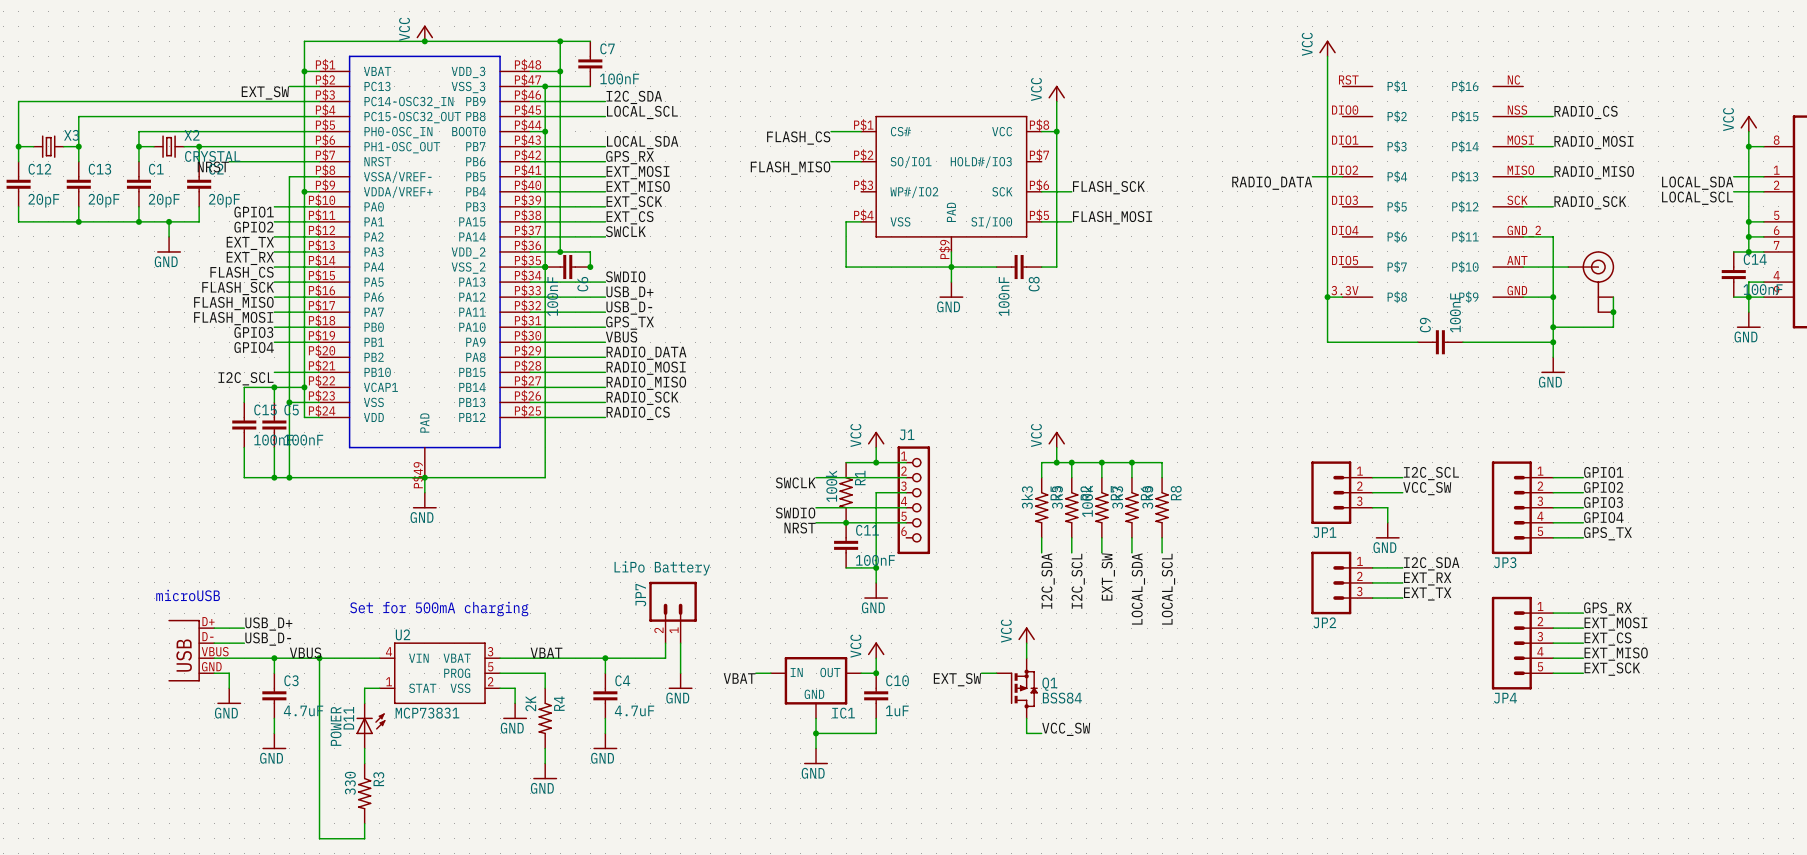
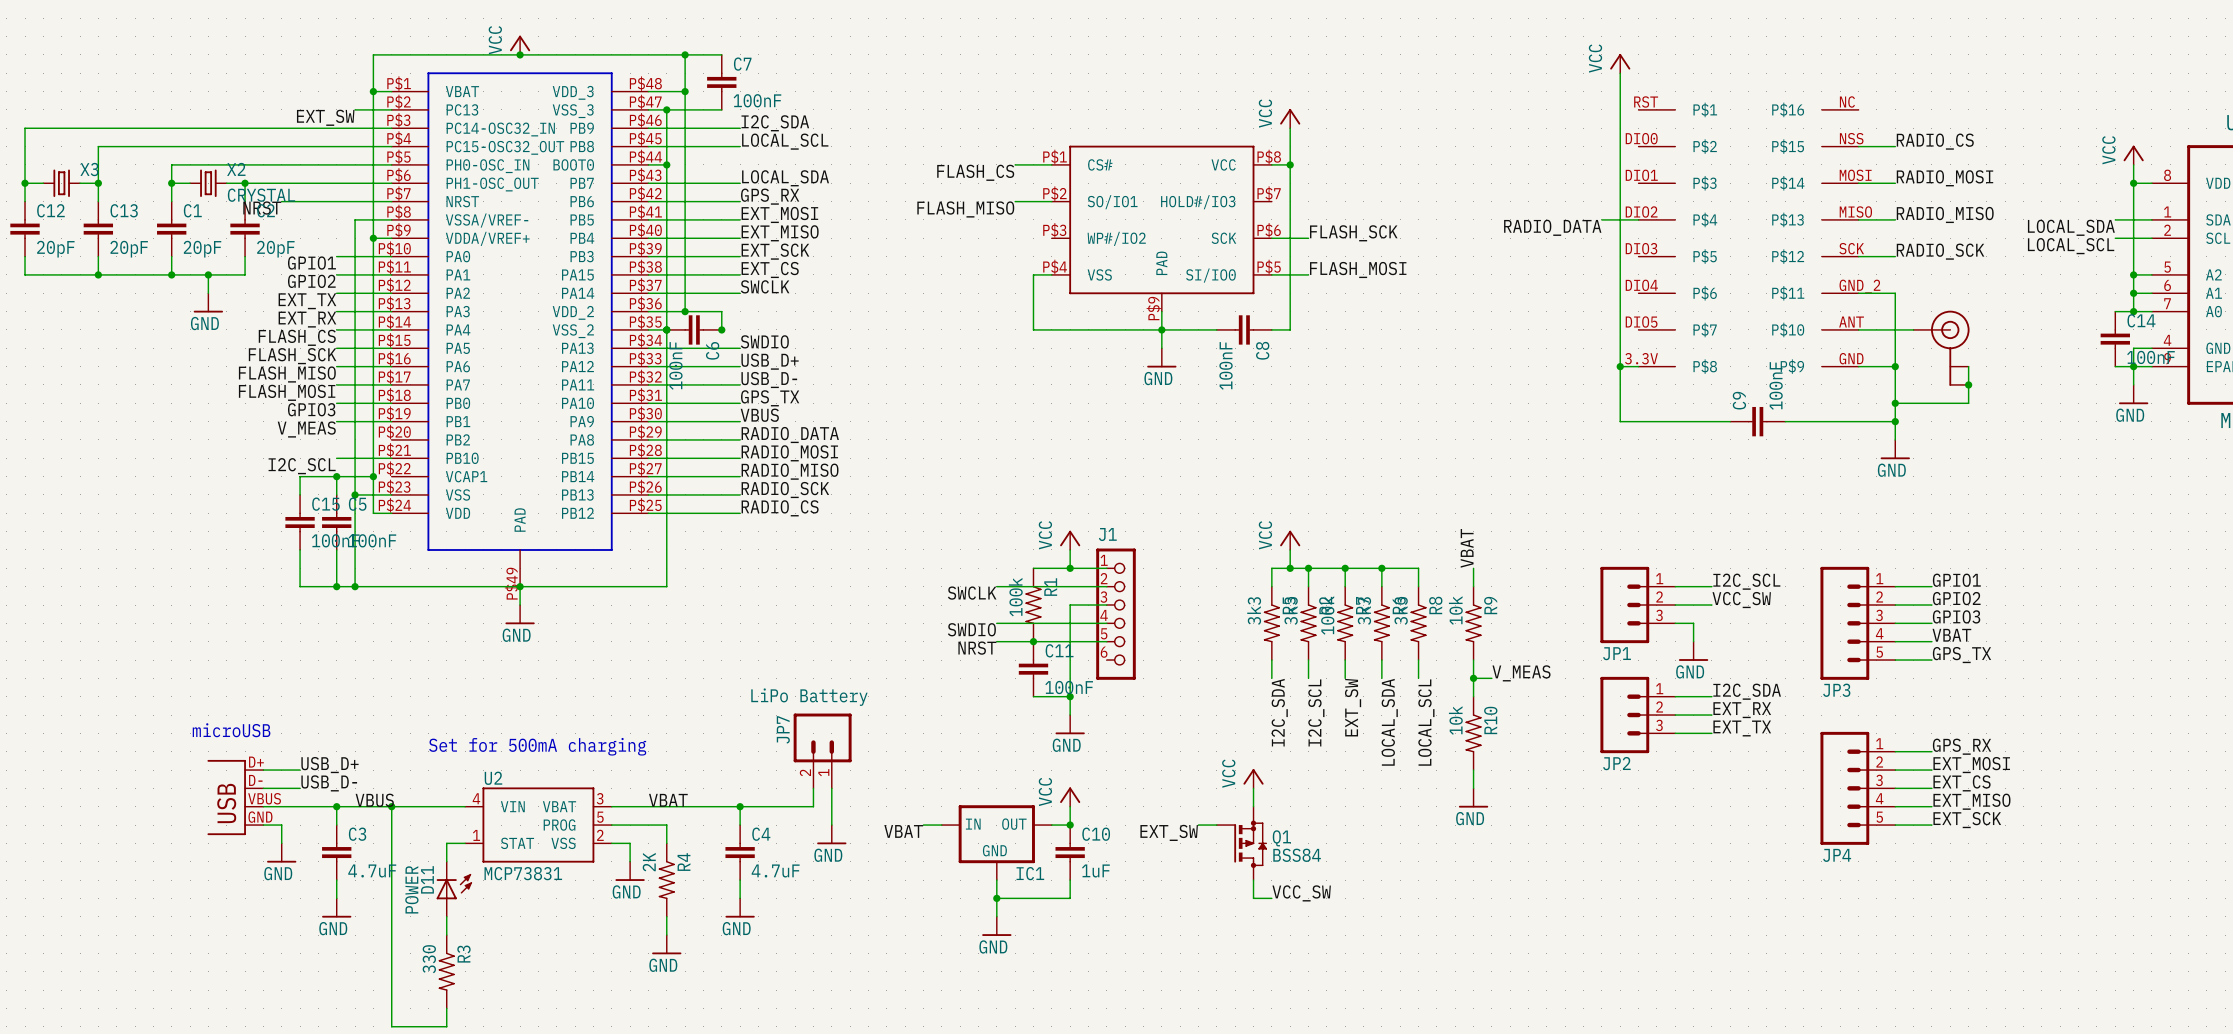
label: GPIO4 (254, 347) -> V_MEAS (306, 429)
label: none -> VBAT (1467, 548)
wire: none -> (1473, 568) (1473, 586)
R9: none -> 10k (1473, 623)
label: GPIO4 (1603, 517) -> VBAT (1951, 635)
wire: none -> (1473, 660) (1473, 696)
label: none -> V_MEAS (1521, 673)
wire: none -> (1473, 678) (1491, 678)
junction: none -> (1473, 678)
R10: none -> 10k (1473, 733)
wire: none -> (1473, 770) (1473, 788)
power symbol: none -> GND (1473, 797)

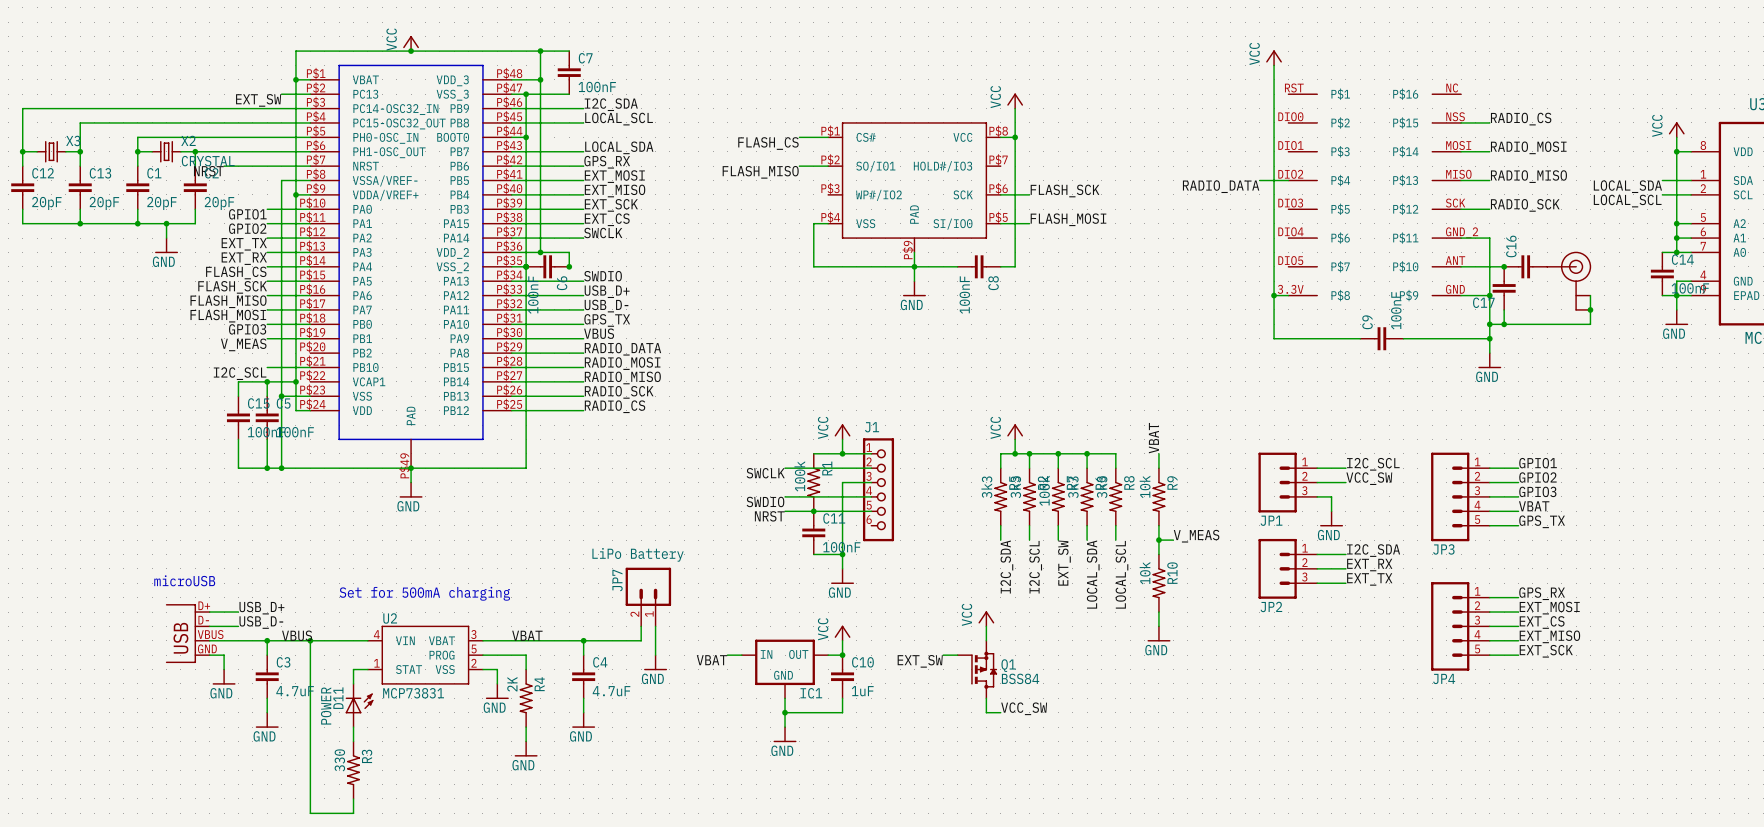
junction: none -> (1504, 266)
C16: none -> (1525, 266)
part position: (1941, 348) -> (1569, 281)
C17: none -> (1504, 288)
wire: (1968, 366) (1968, 403) -> (1590, 295) (1590, 324) (1547, 324)
wire: none -> (1504, 309) (1504, 324)
junction: (1968, 384) -> none
junction: none -> (1590, 309)
junction: none -> (1504, 324)

